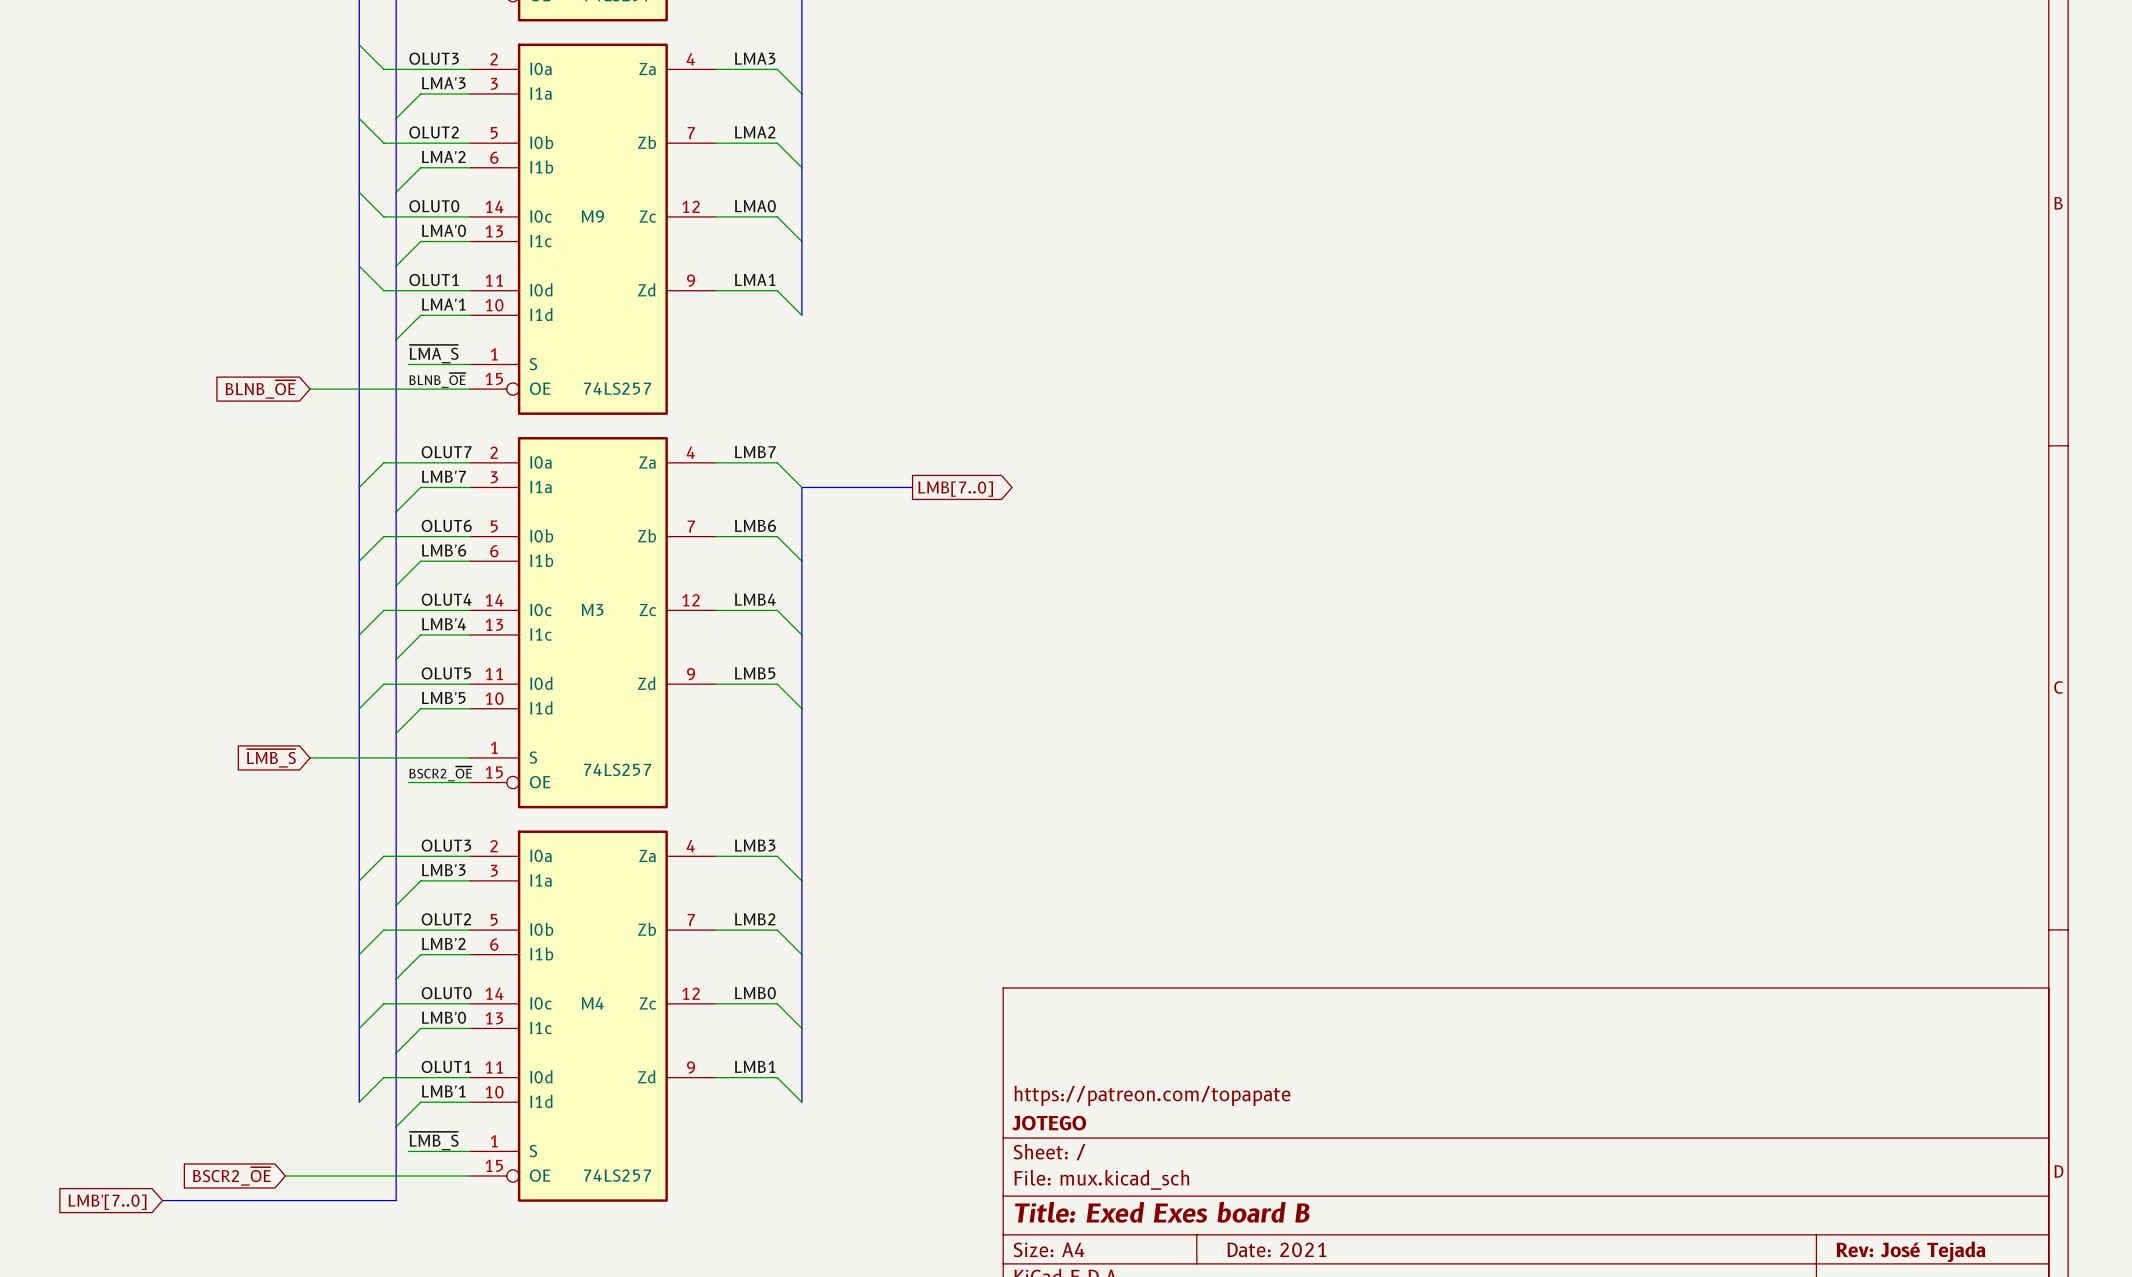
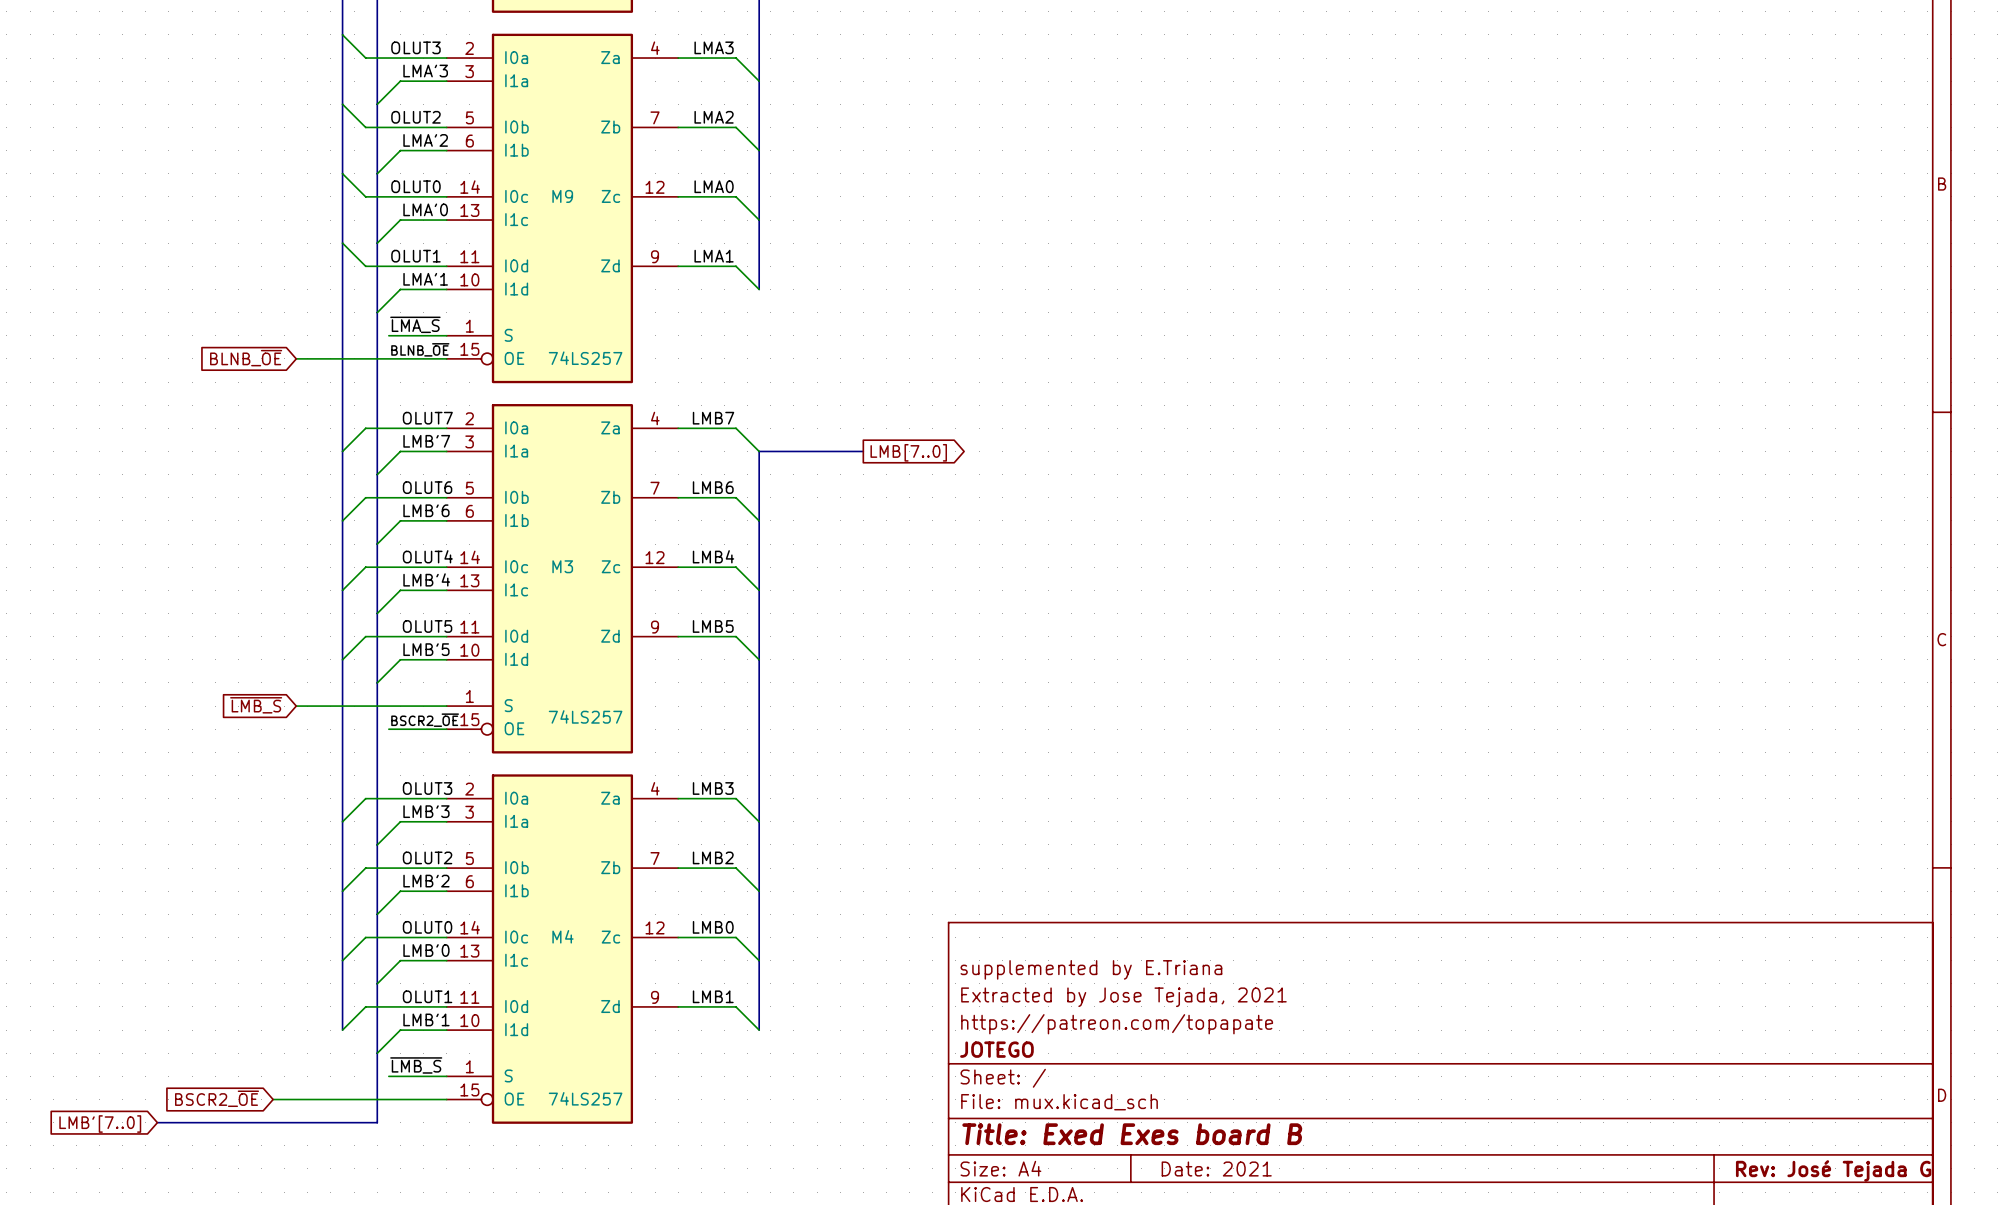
title block: none -> supplemented by E.Triana (1091, 969)
title block: none -> Extracted by Jose Tejada, 2021 (1123, 997)
title block: Rev: José Tejada (1910, 1251) -> Rev: José Tejada G (1833, 1170)

